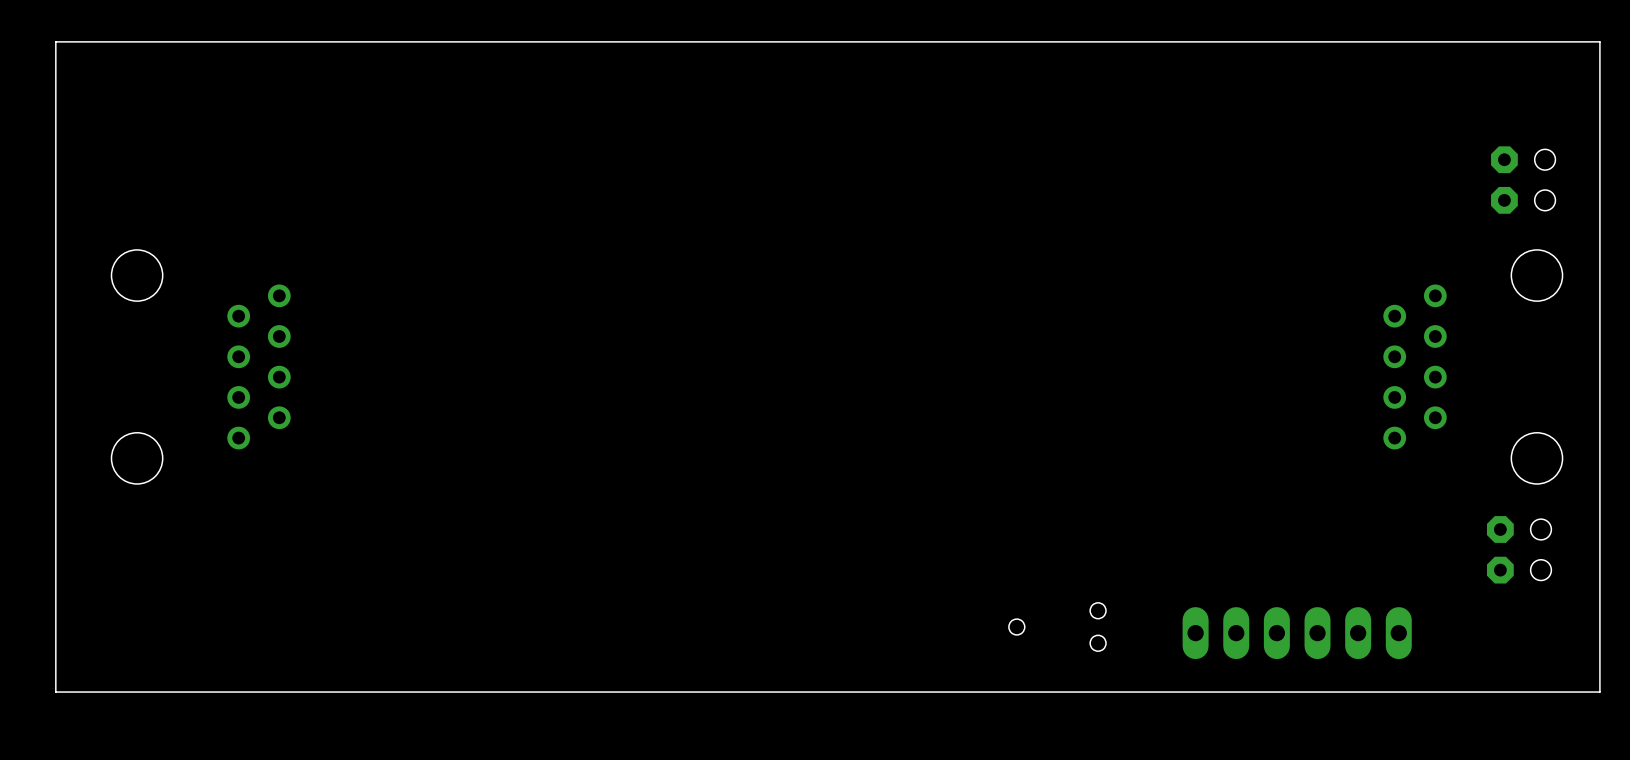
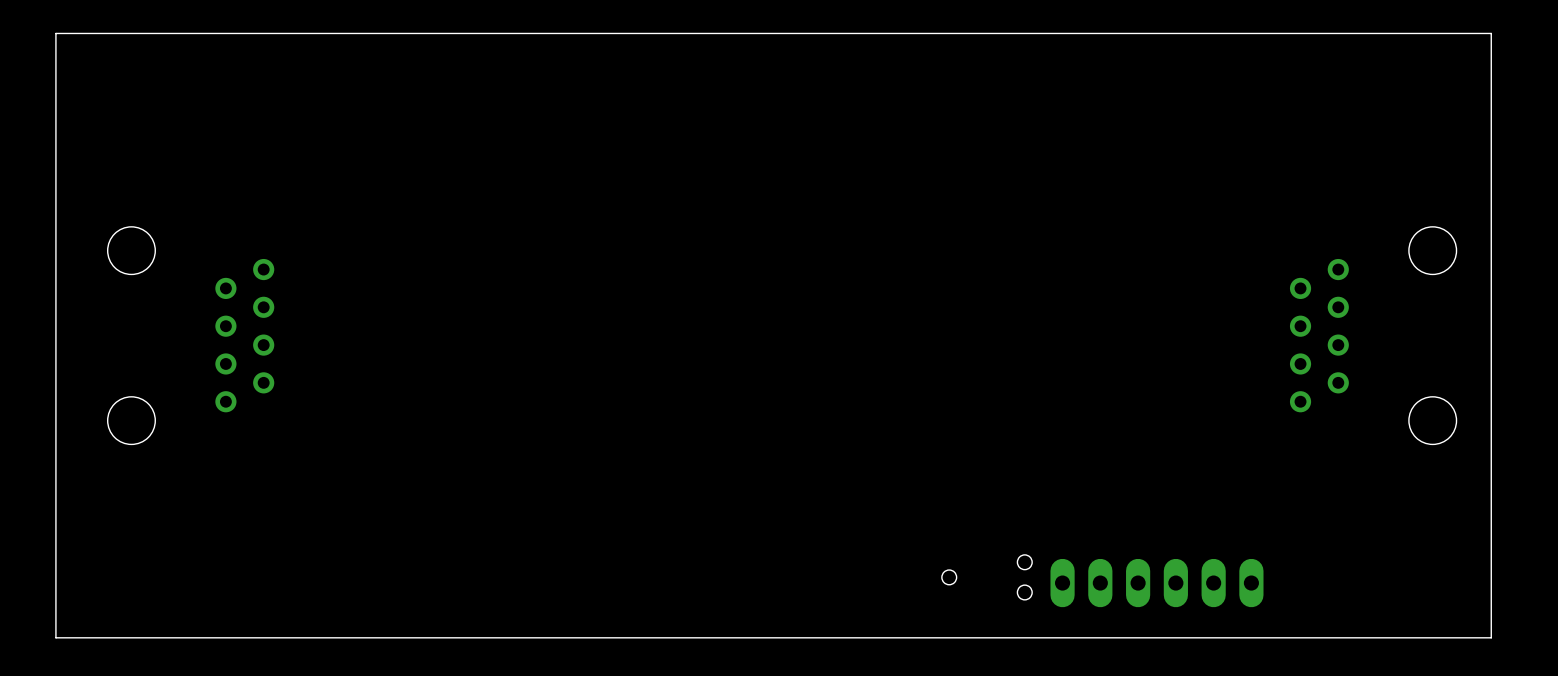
part: (1523, 180) -> none
part: (1519, 549) -> none
part position: (1297, 633) -> (1156, 583)

